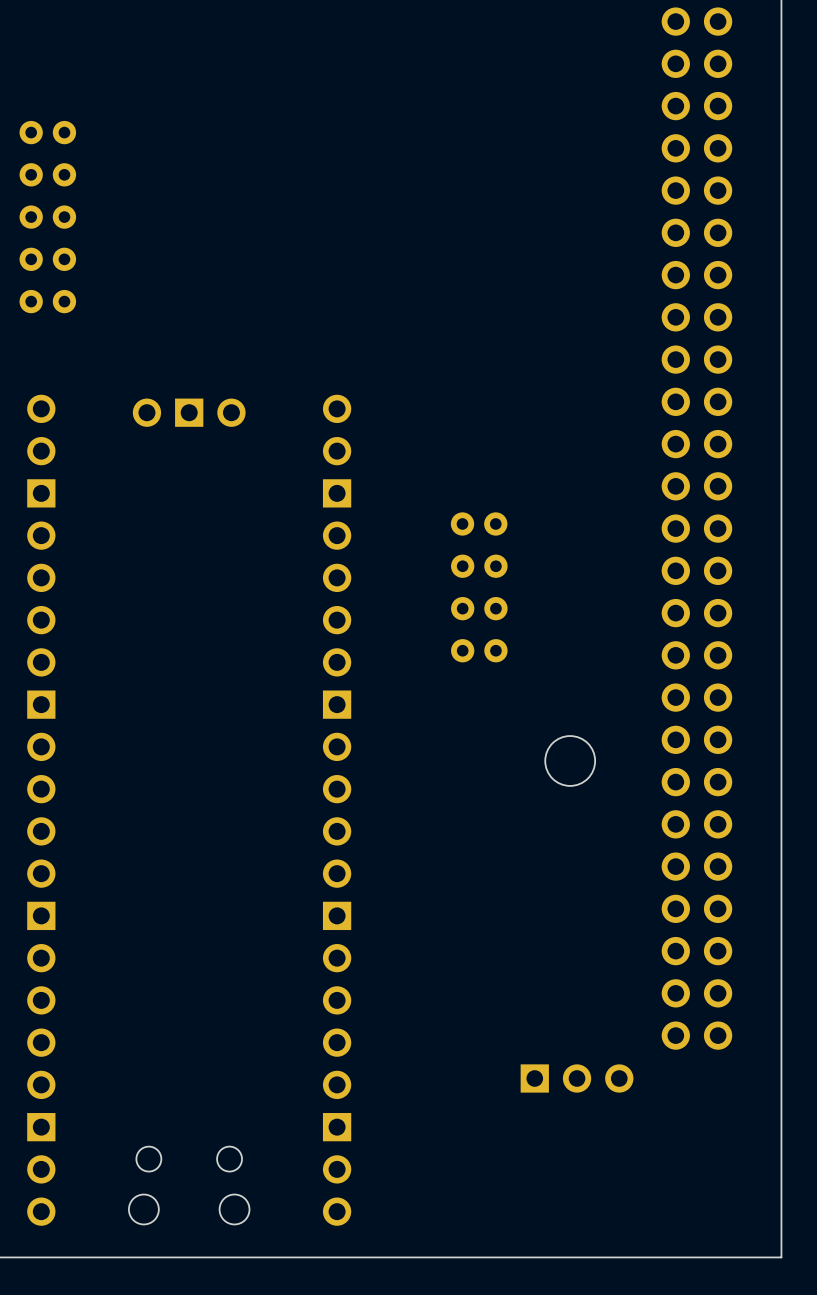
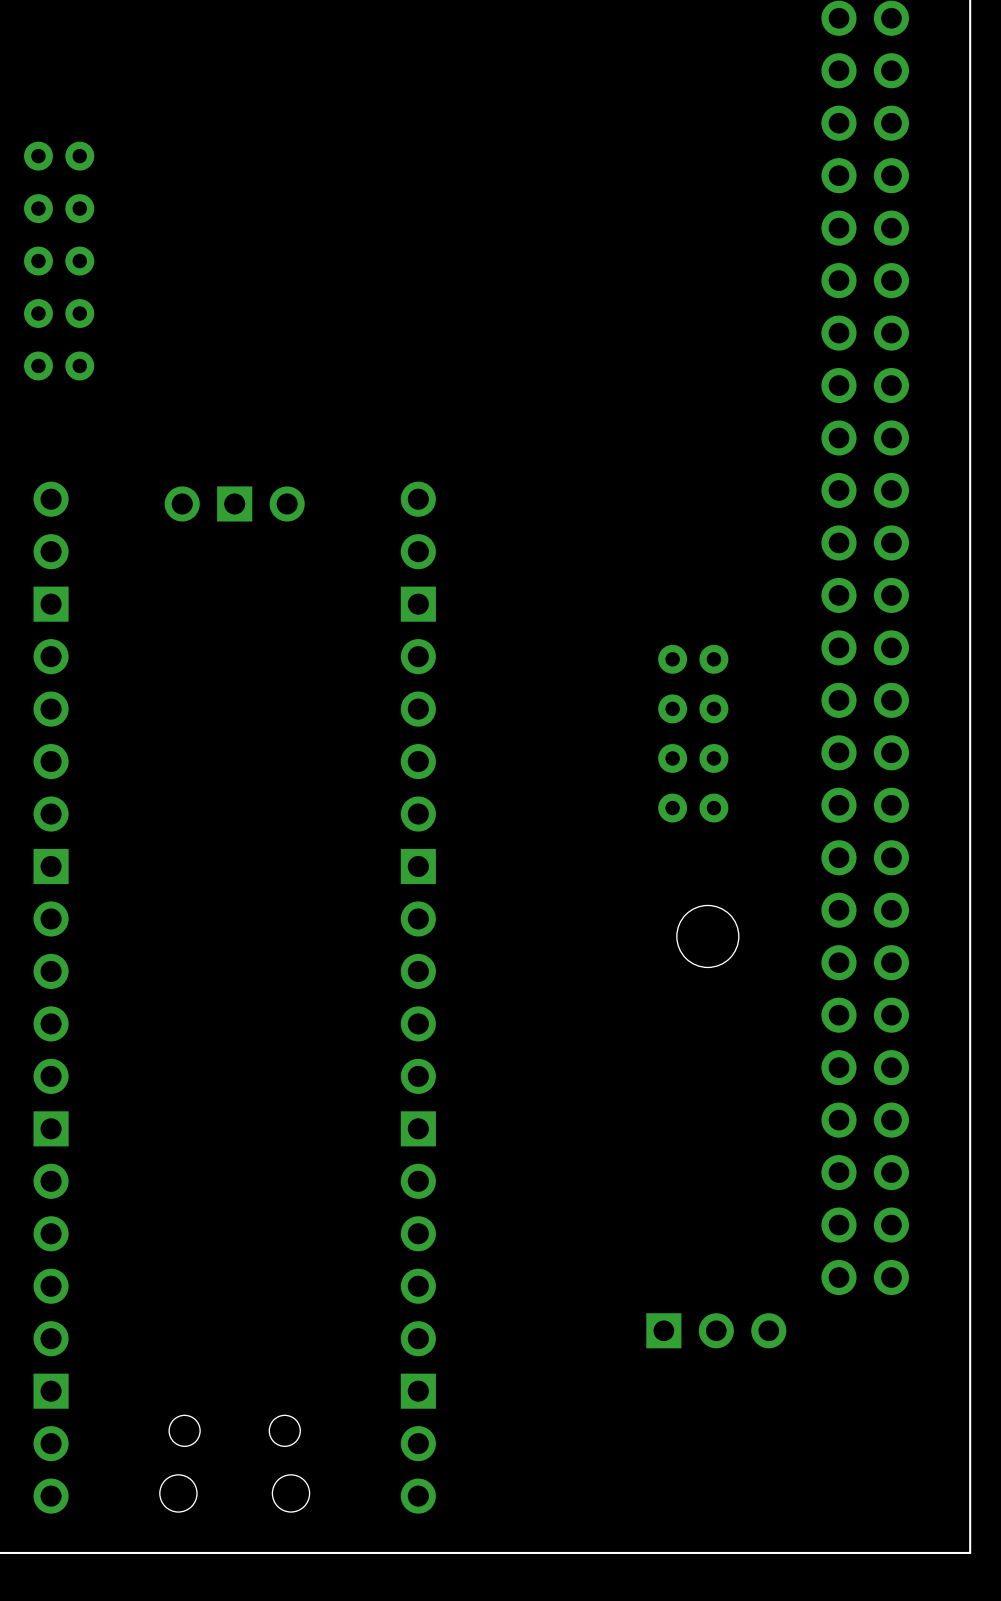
part: (479, 523) -> none
part: none -> (693, 659)
part: (479, 566) -> none
part: none -> (693, 708)
part: (479, 608) -> none
part: none -> (693, 758)
part: (479, 650) -> none
part: none -> (693, 808)

